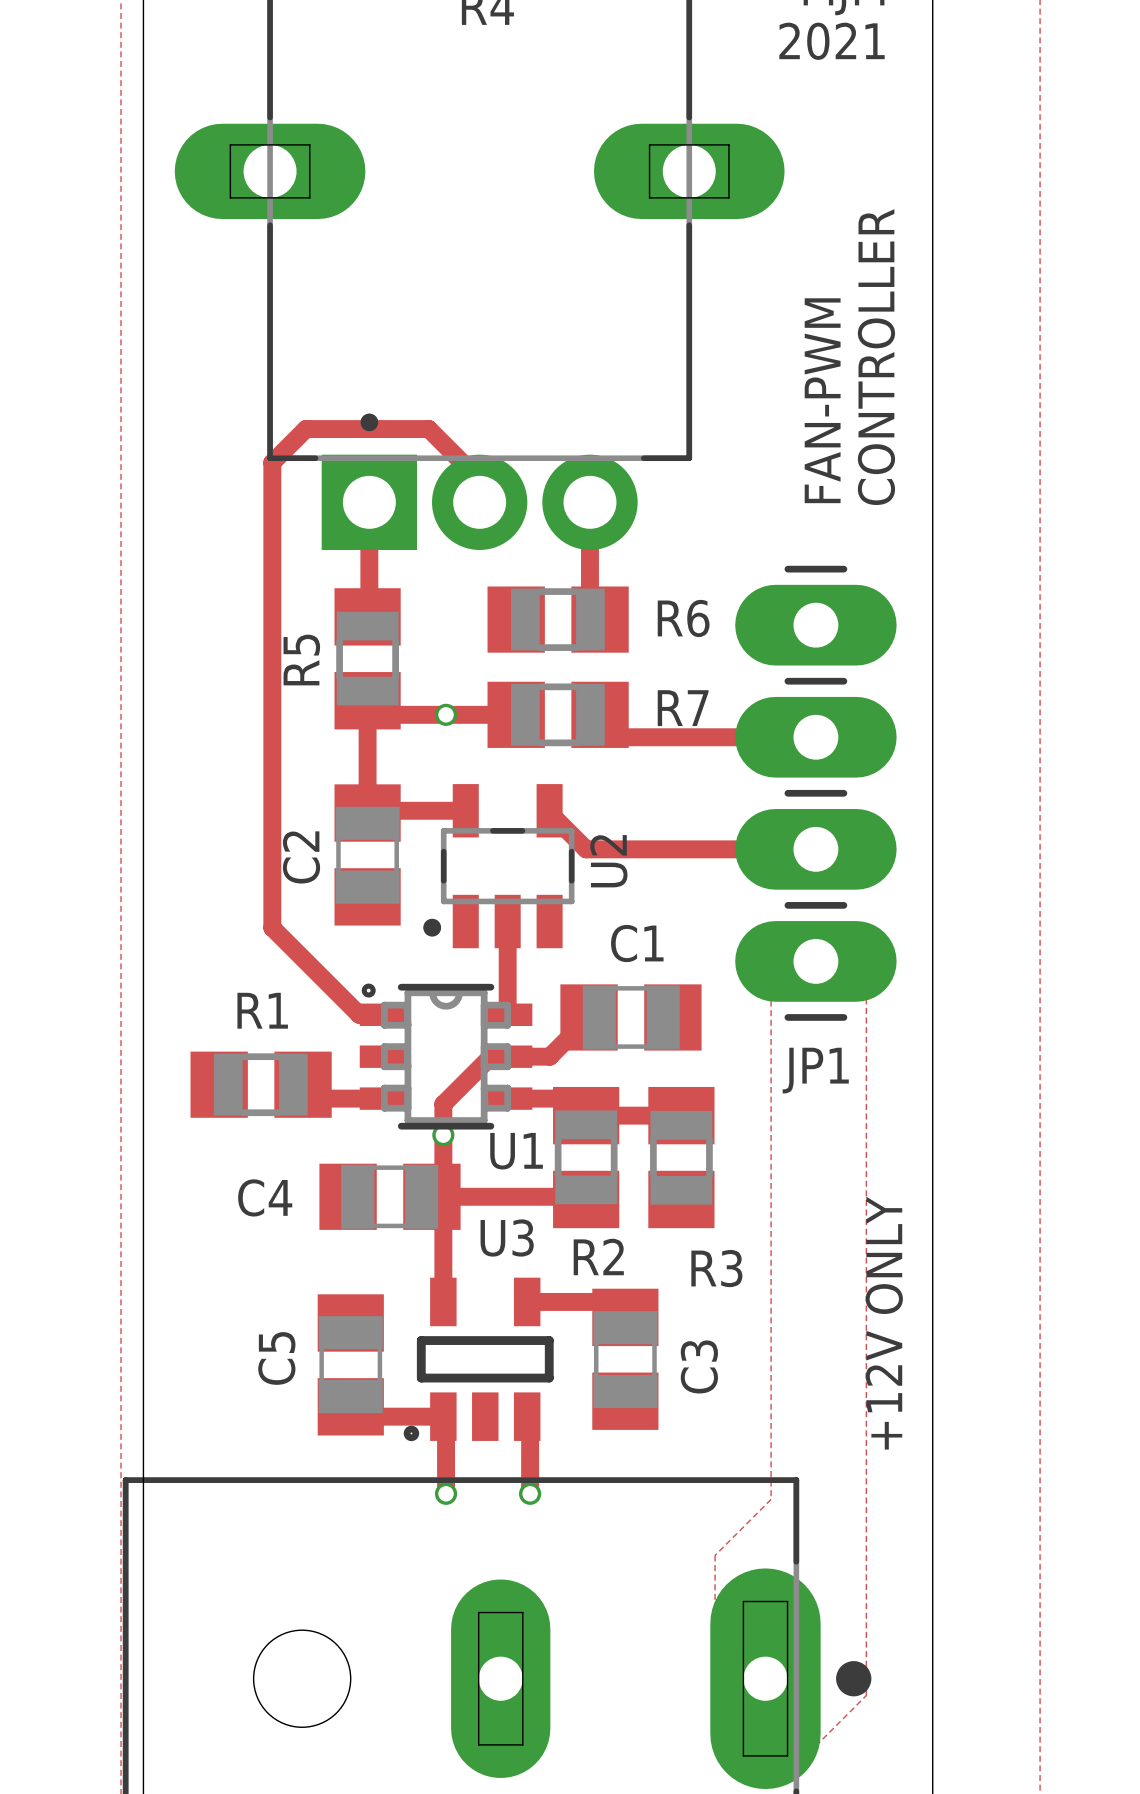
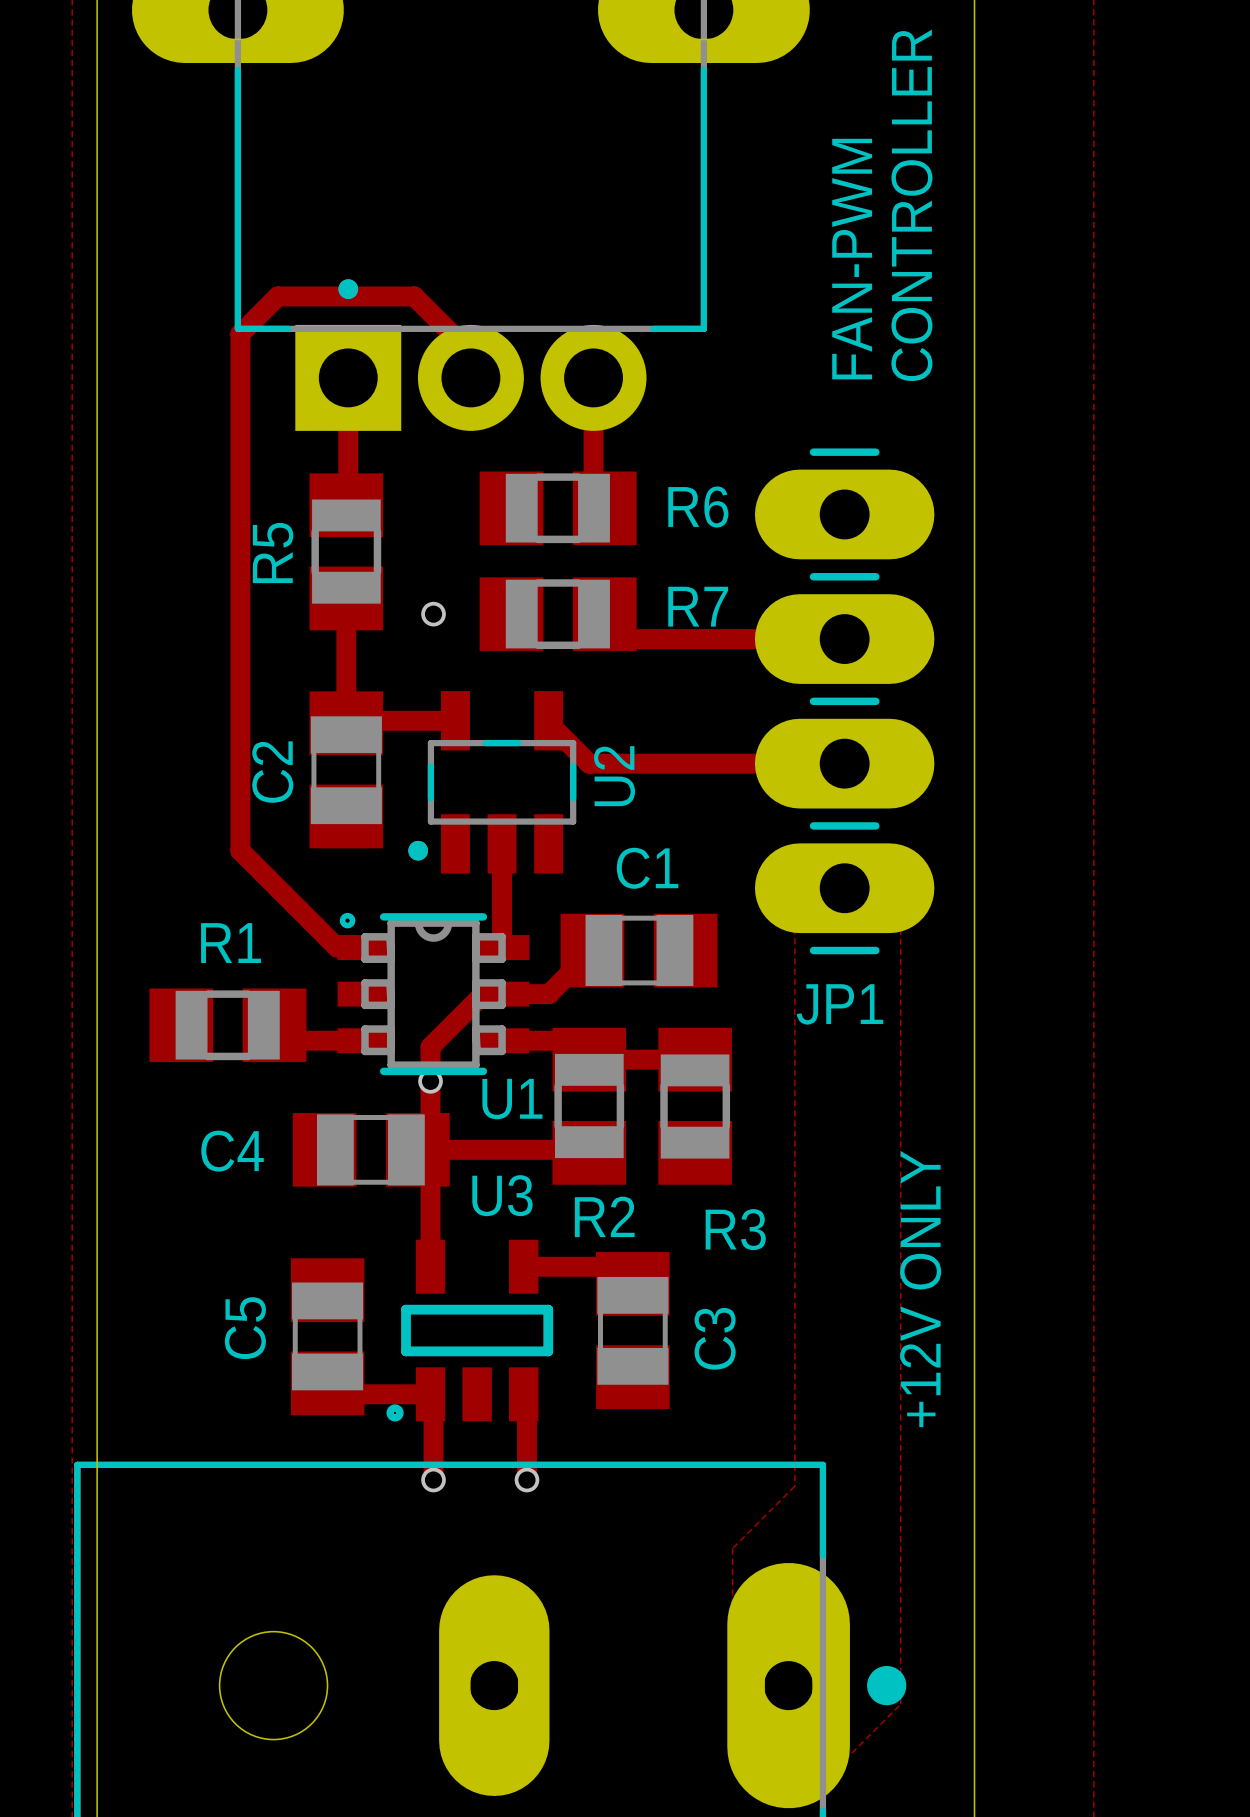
track: (367, 709) (373, 714) (516, 714) -> none

